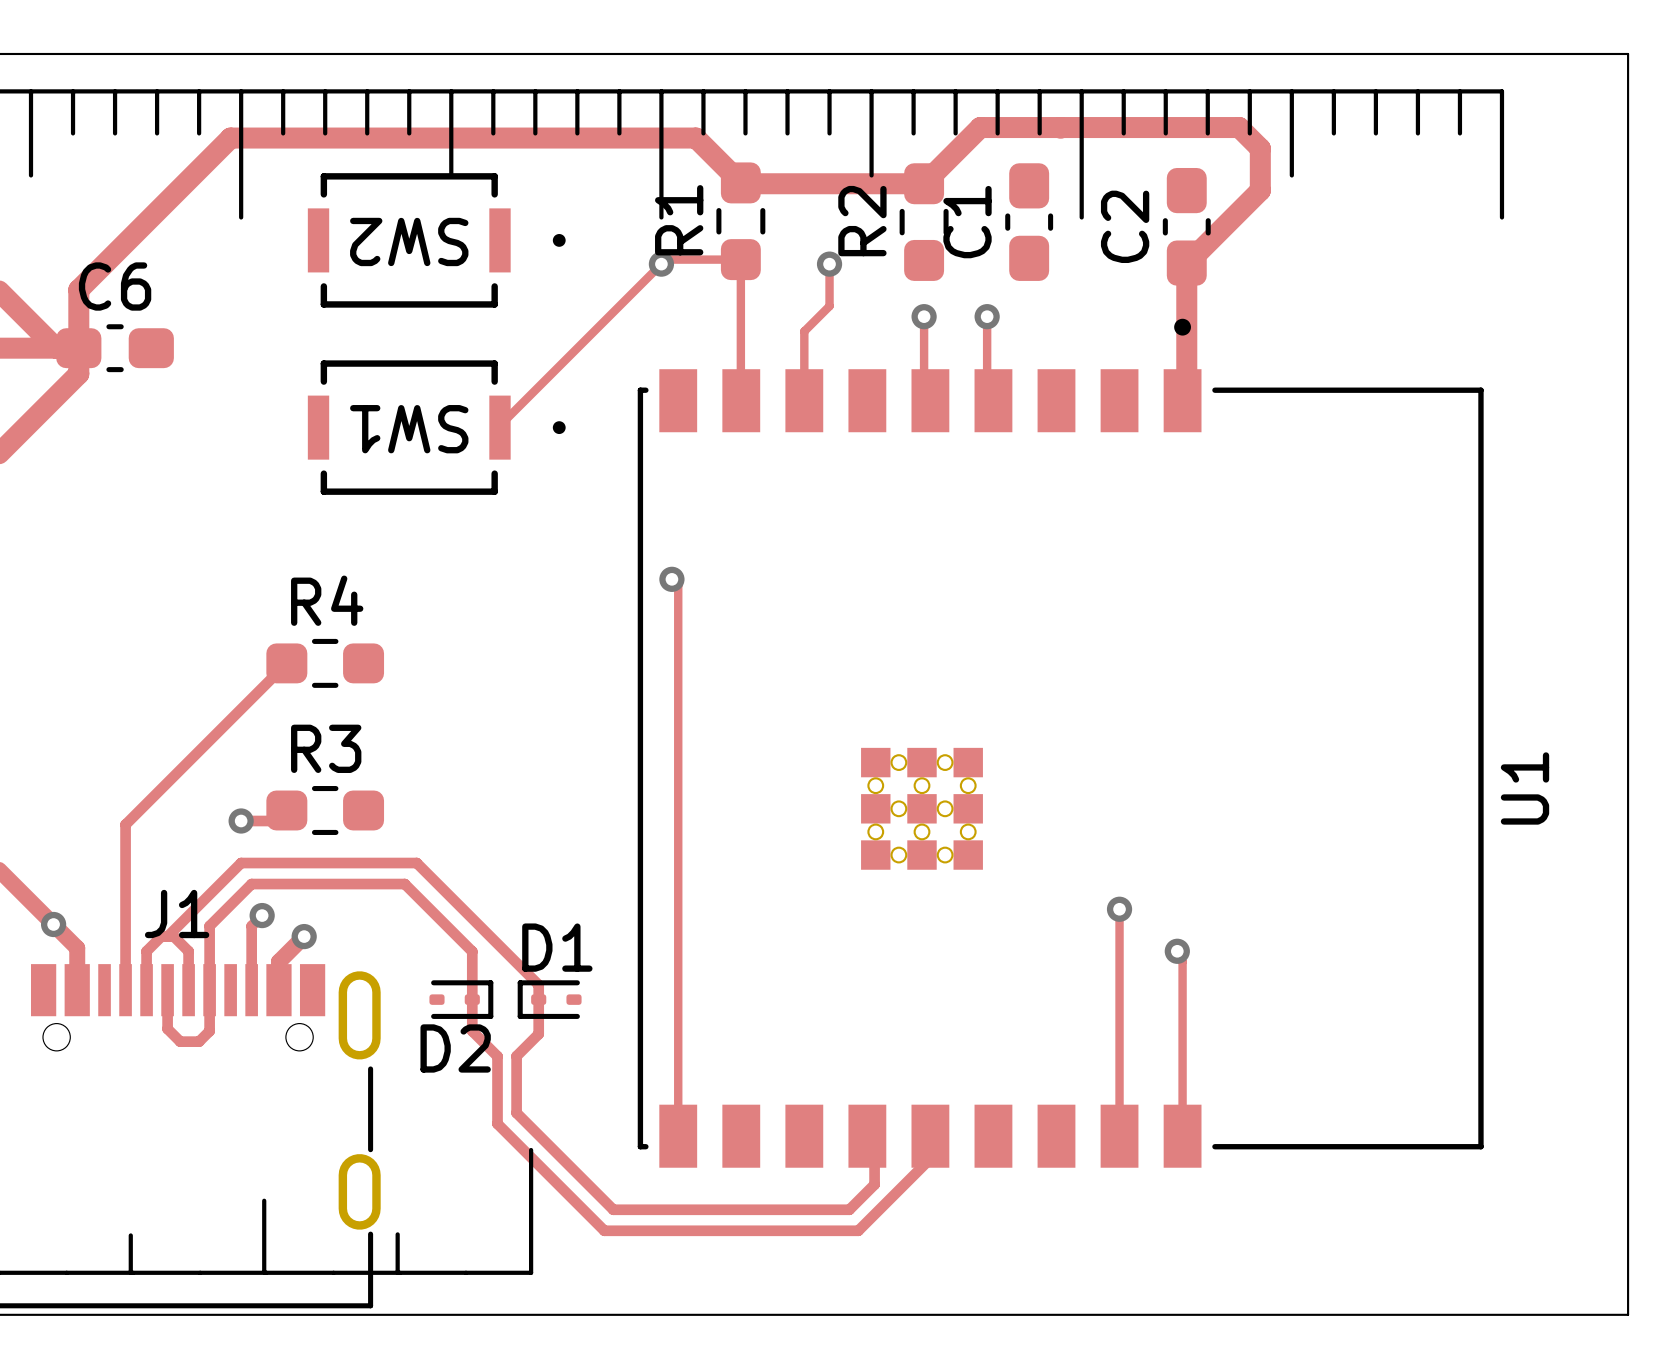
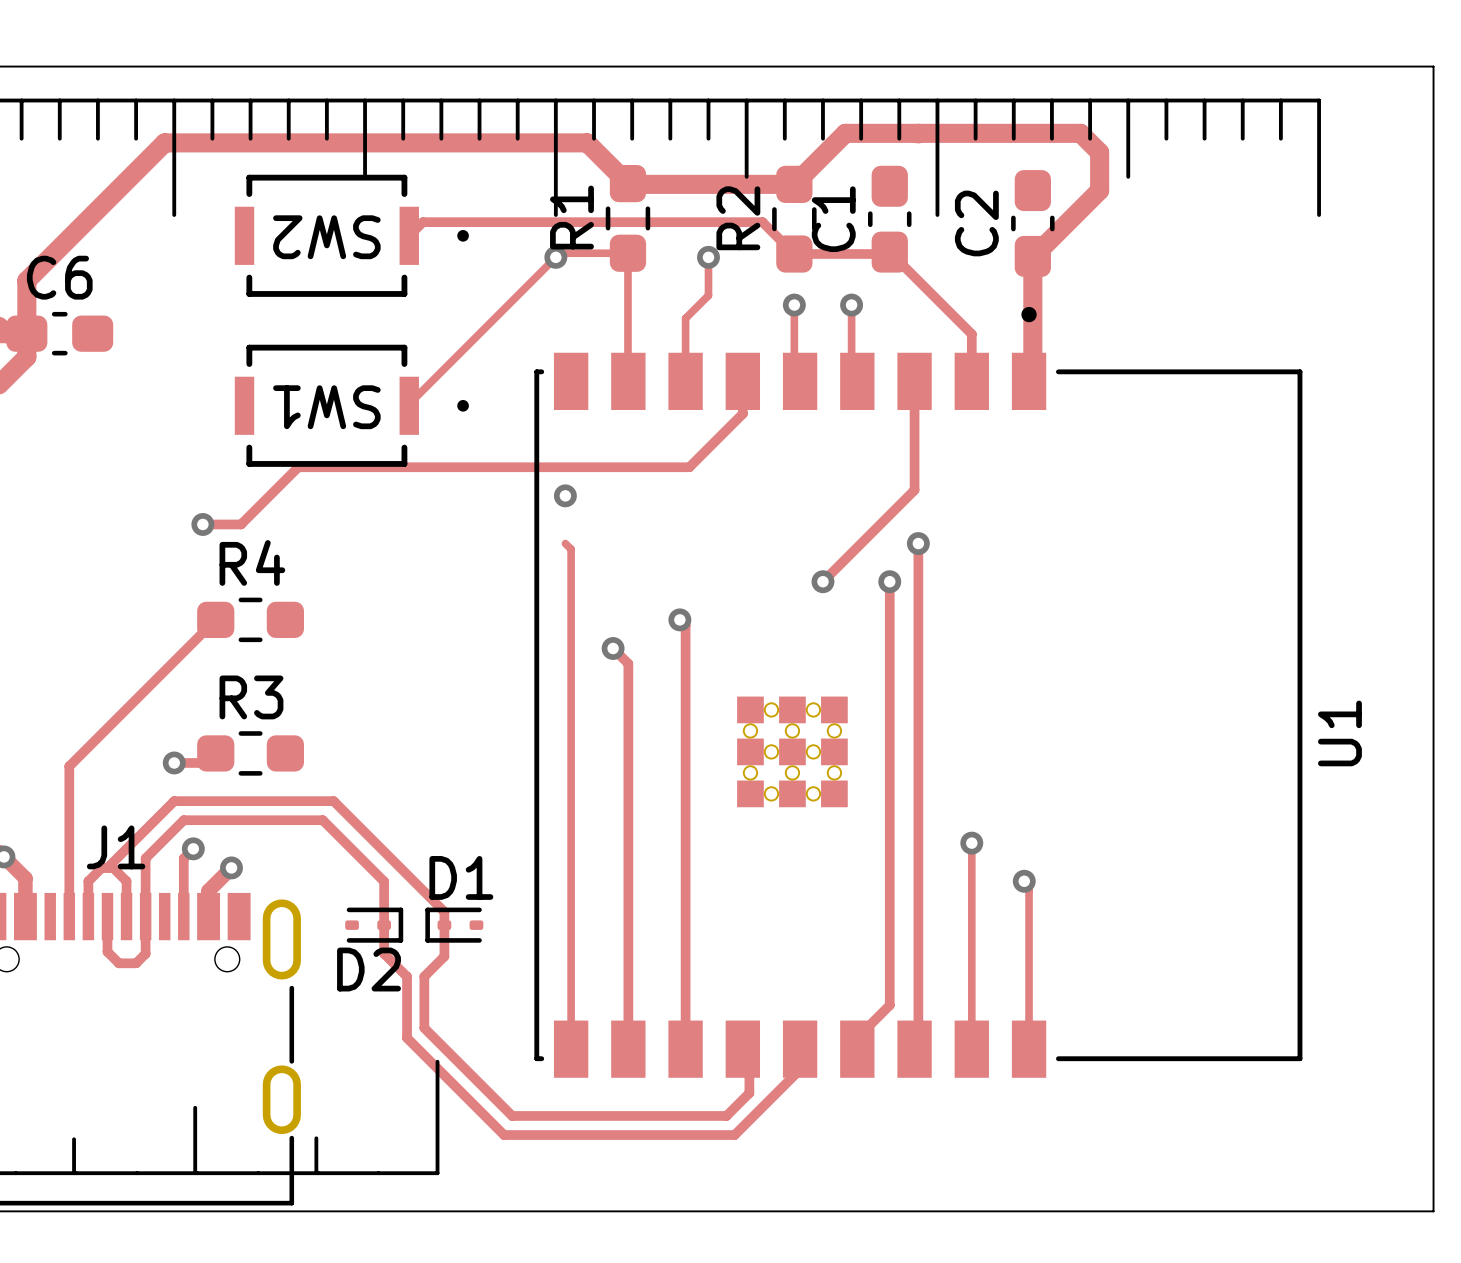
track: none -> (409, 235) (422, 222) (762, 222) (794, 254) (887, 254) (889, 252) (971, 334) (971, 381)
track: none -> (742, 381) (742, 413) (689, 467) (298, 467) (241, 524) (202, 524)
track: none -> (914, 381) (914, 490) (822, 581)
via: none -> (202, 524)
via position: (671, 579) -> (565, 495)
track: none -> (918, 543) (918, 1045) (914, 1049)
via: none -> (918, 543)
via: none -> (822, 581)
track: none -> (889, 581) (889, 1005) (857, 1037) (857, 1049)
via: none -> (889, 581)
track: none -> (679, 619) (685, 625) (685, 1049)
via: none -> (679, 619)
track: none -> (613, 648) (628, 663) (628, 1049)
via: none -> (613, 648)

